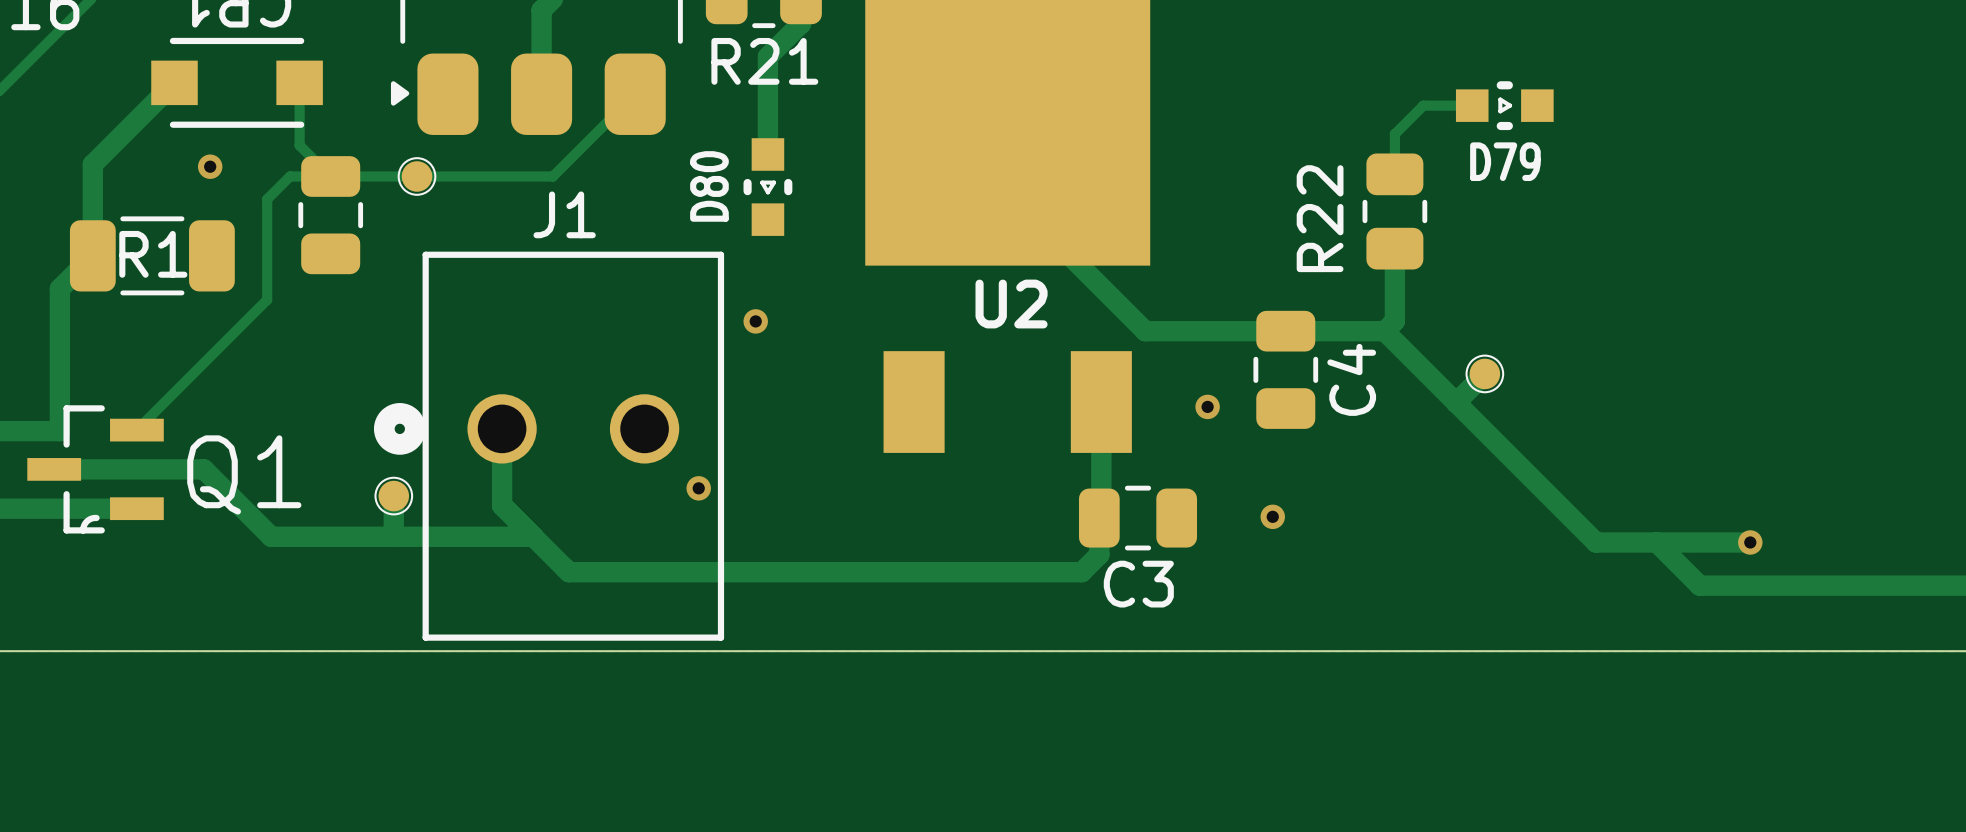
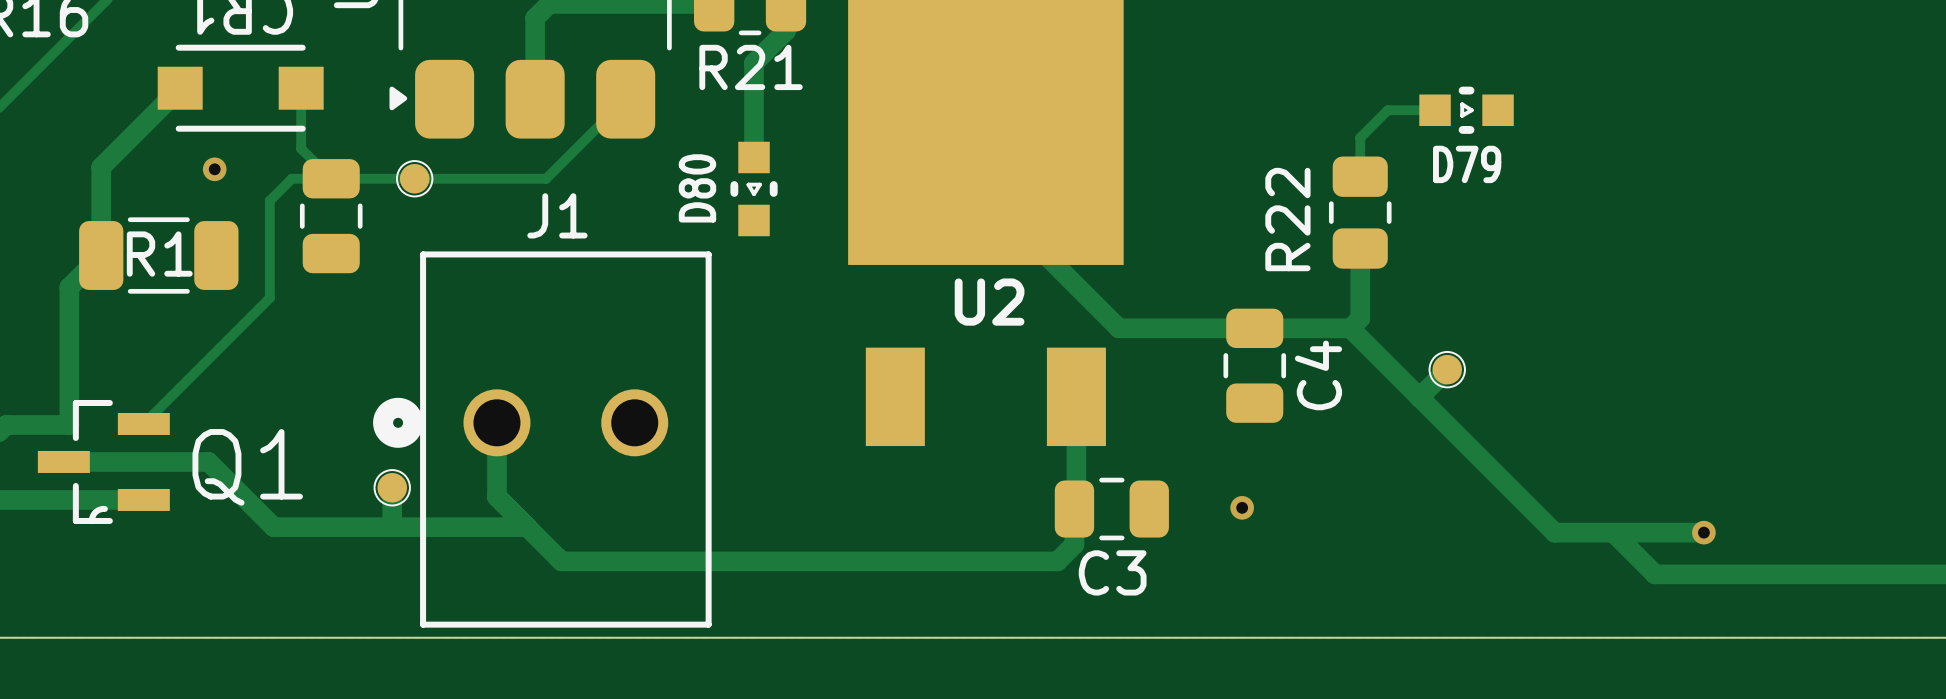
via: (755, 321) -> none
via: (1207, 406) -> none
via: (698, 488) -> none

